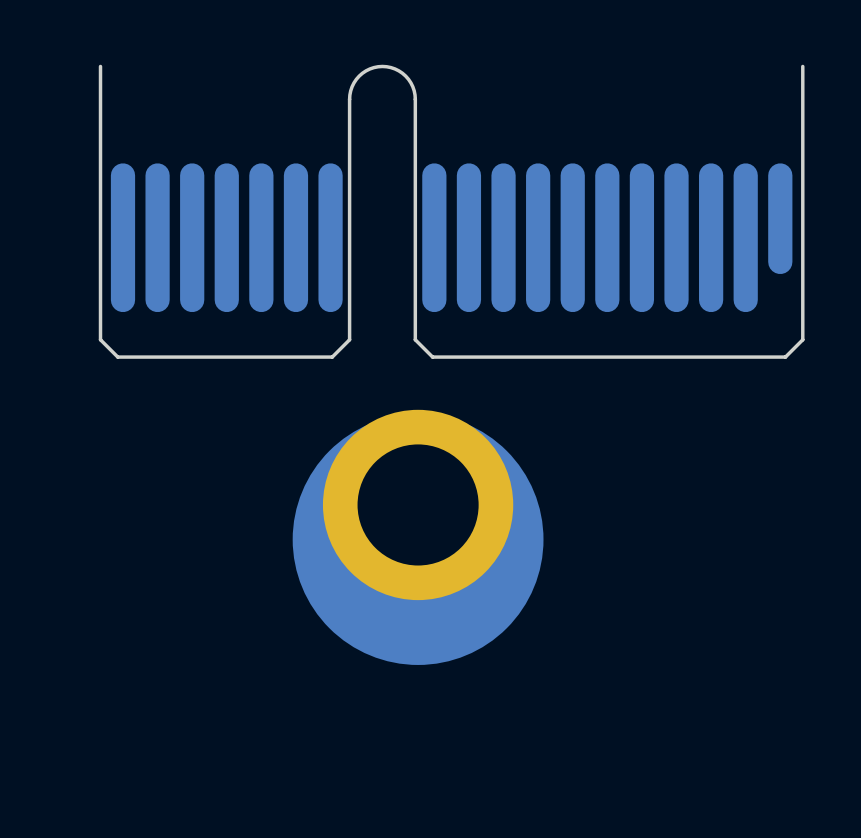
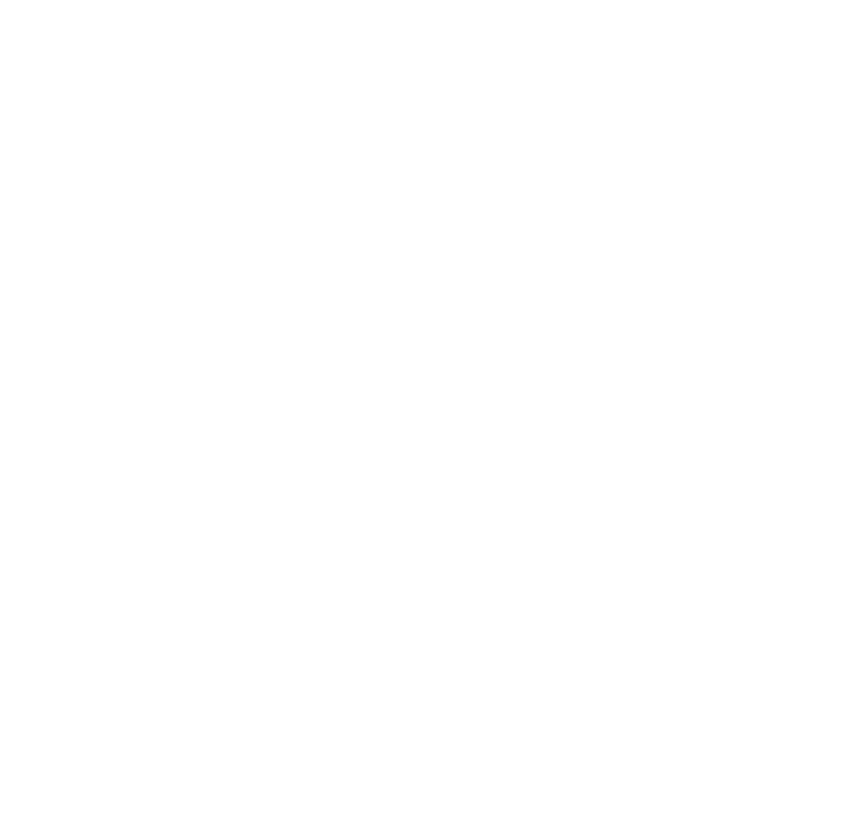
part: (451, 211) -> none
part: (418, 537) -> none

